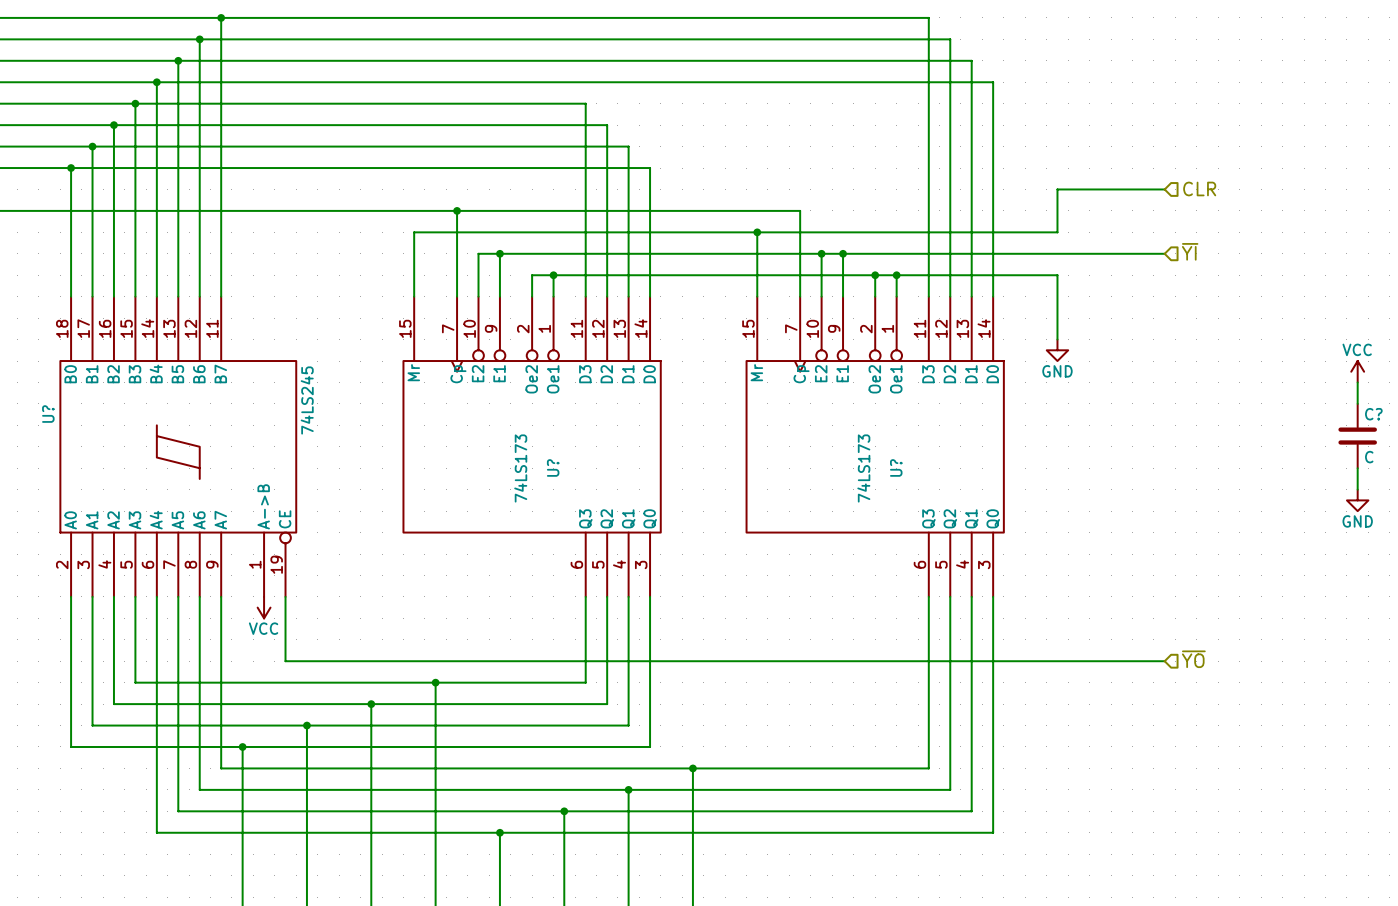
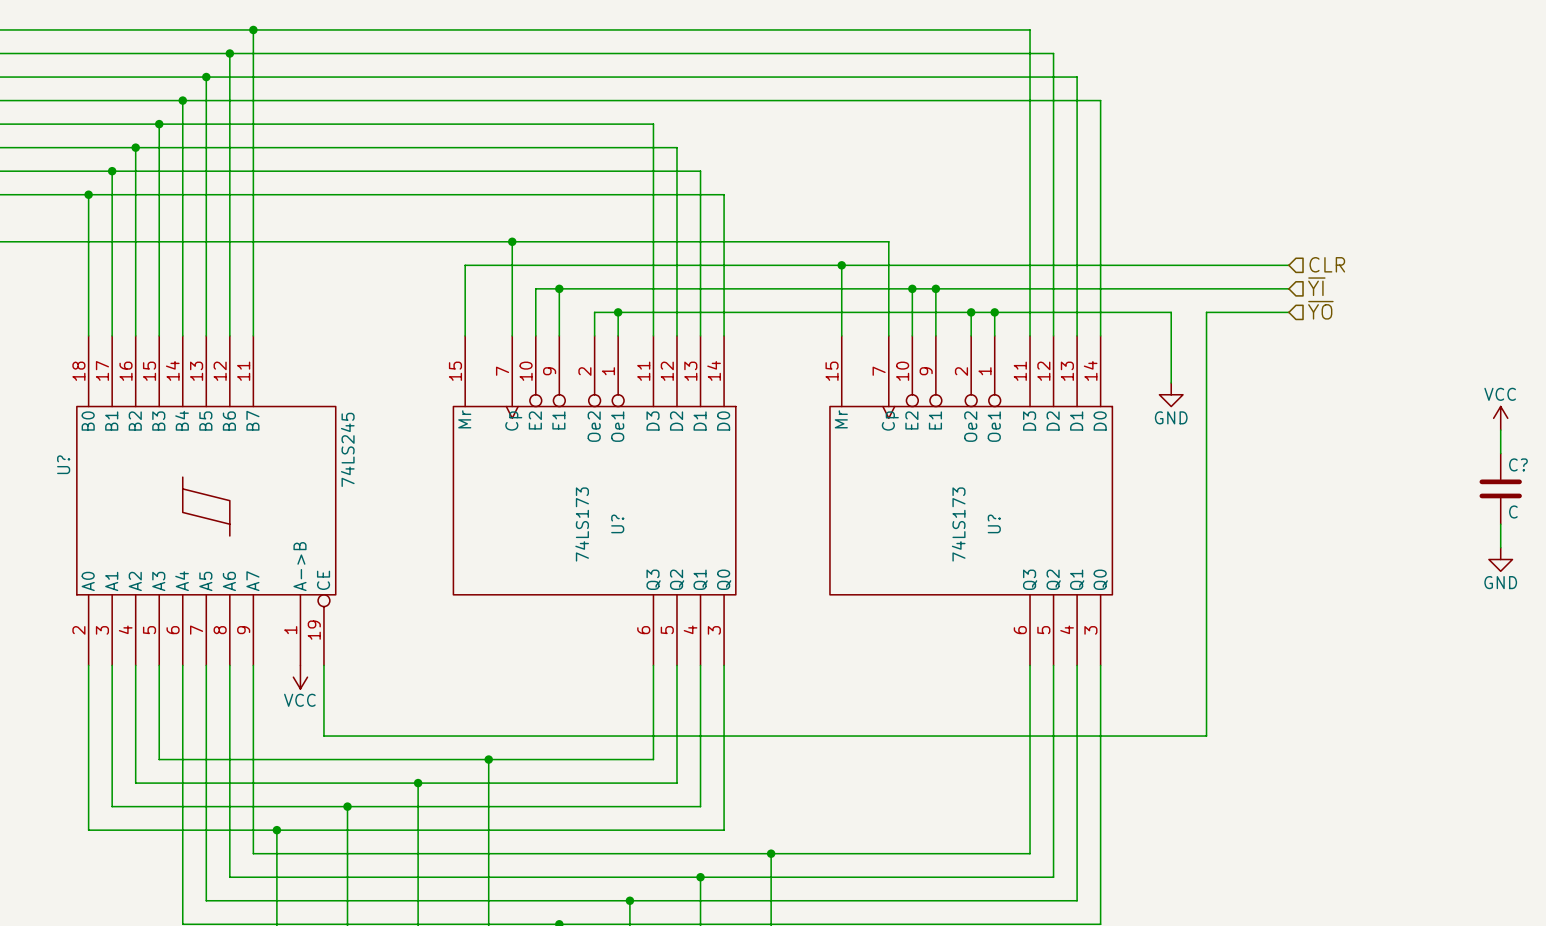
hierarchical label position: CLR (1199, 188) -> CLR (1327, 264)
wire: (1164, 189) (1057, 189) (1057, 232) -> (1288, 265) (1171, 265)
hierarchical label: none -> ~{YO} (1320, 310)
hierarchical label: ~{YO} (1193, 659) -> none
wire: (1089, 661) (1164, 661) -> (1206, 736) (1206, 312) (1288, 312)

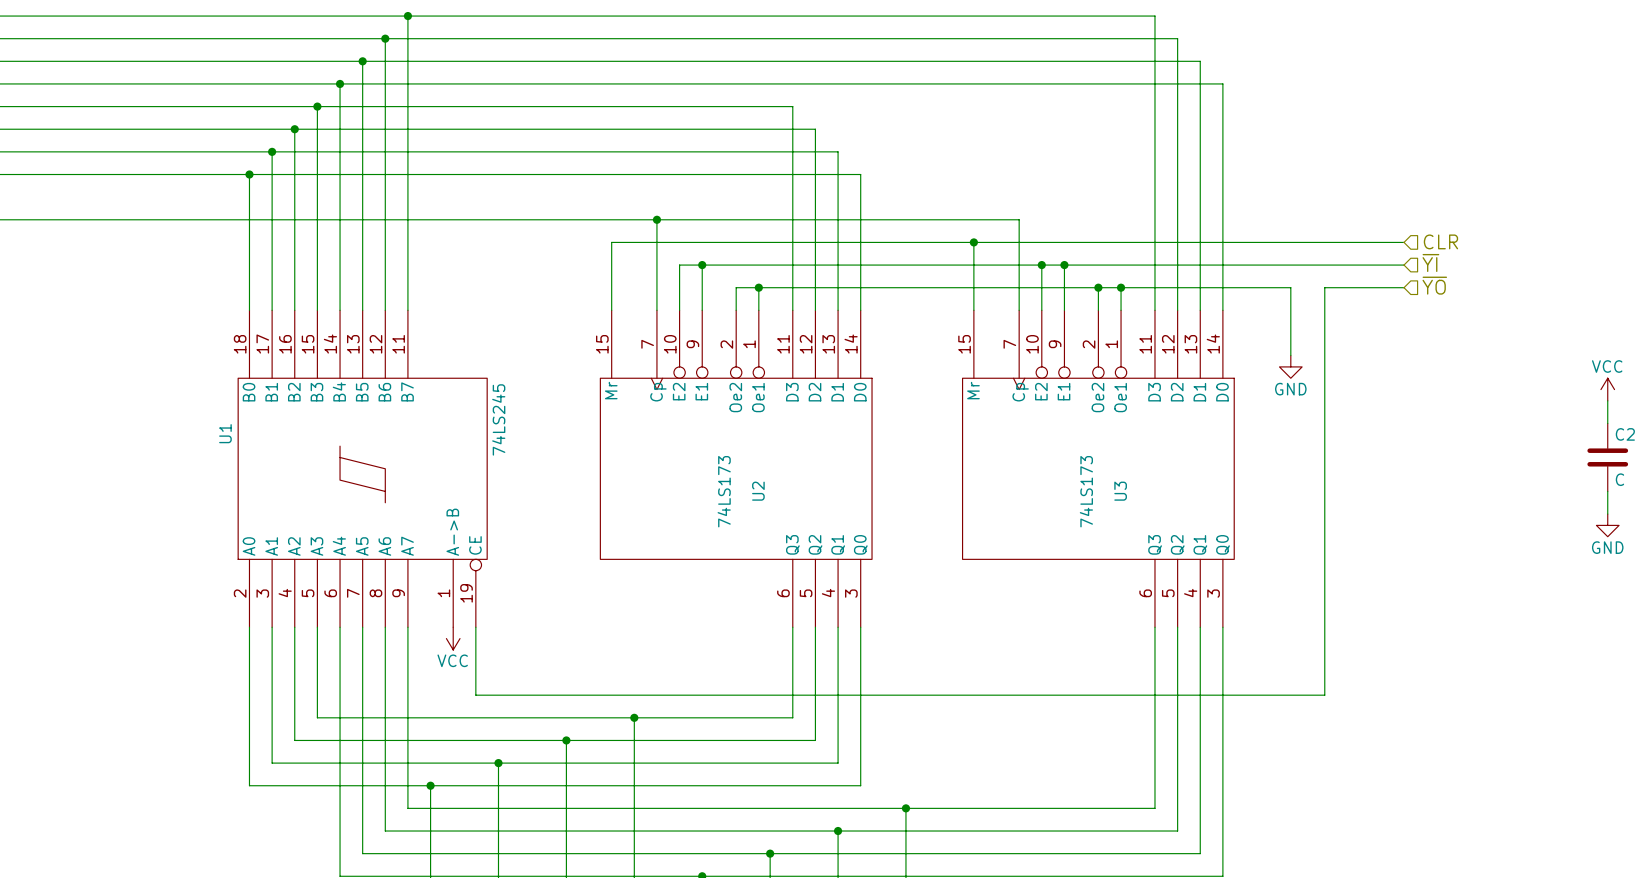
U? name: U? (63, 464) -> U1 (225, 433)
C? name: C? (1518, 464) -> C2 (1625, 434)
U? name: U? (617, 523) -> U2 (758, 491)
U? name: U? (994, 523) -> U3 (1120, 491)

